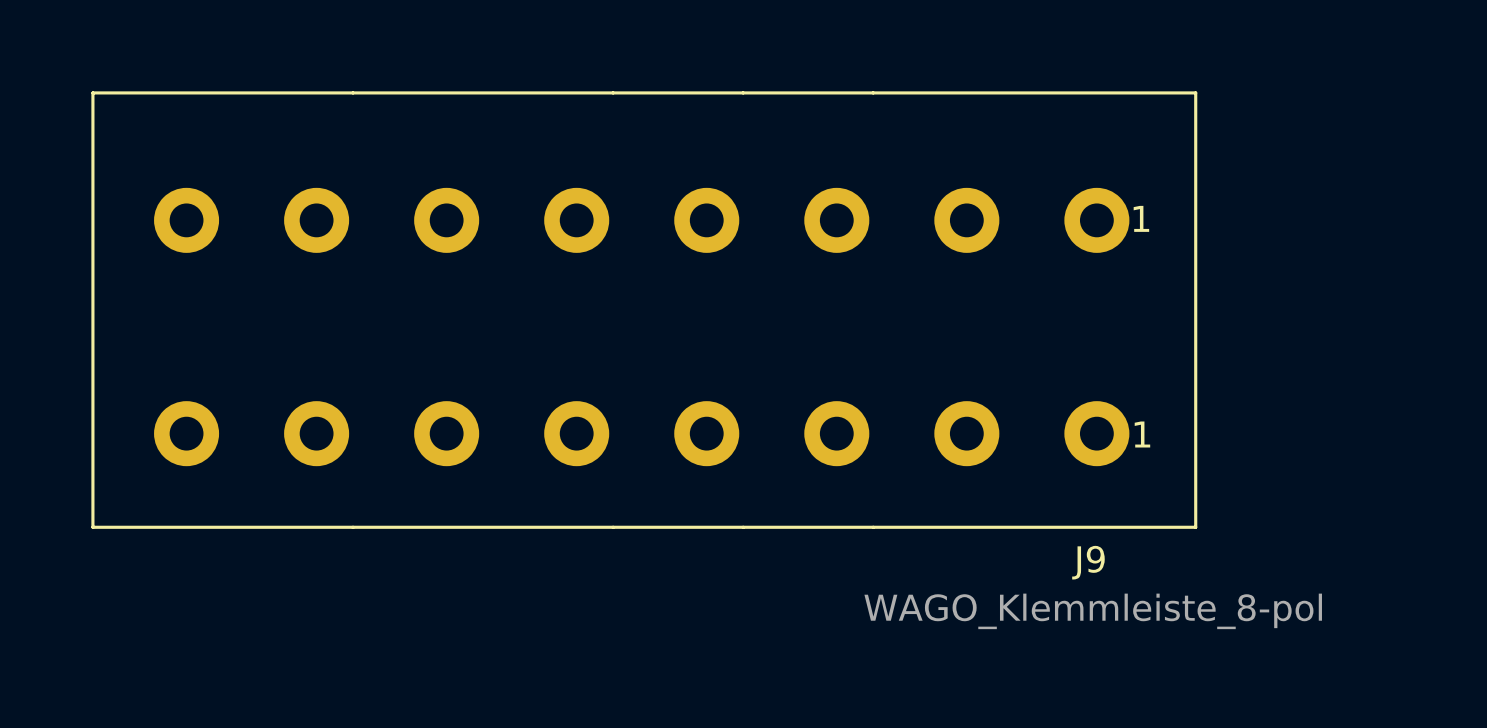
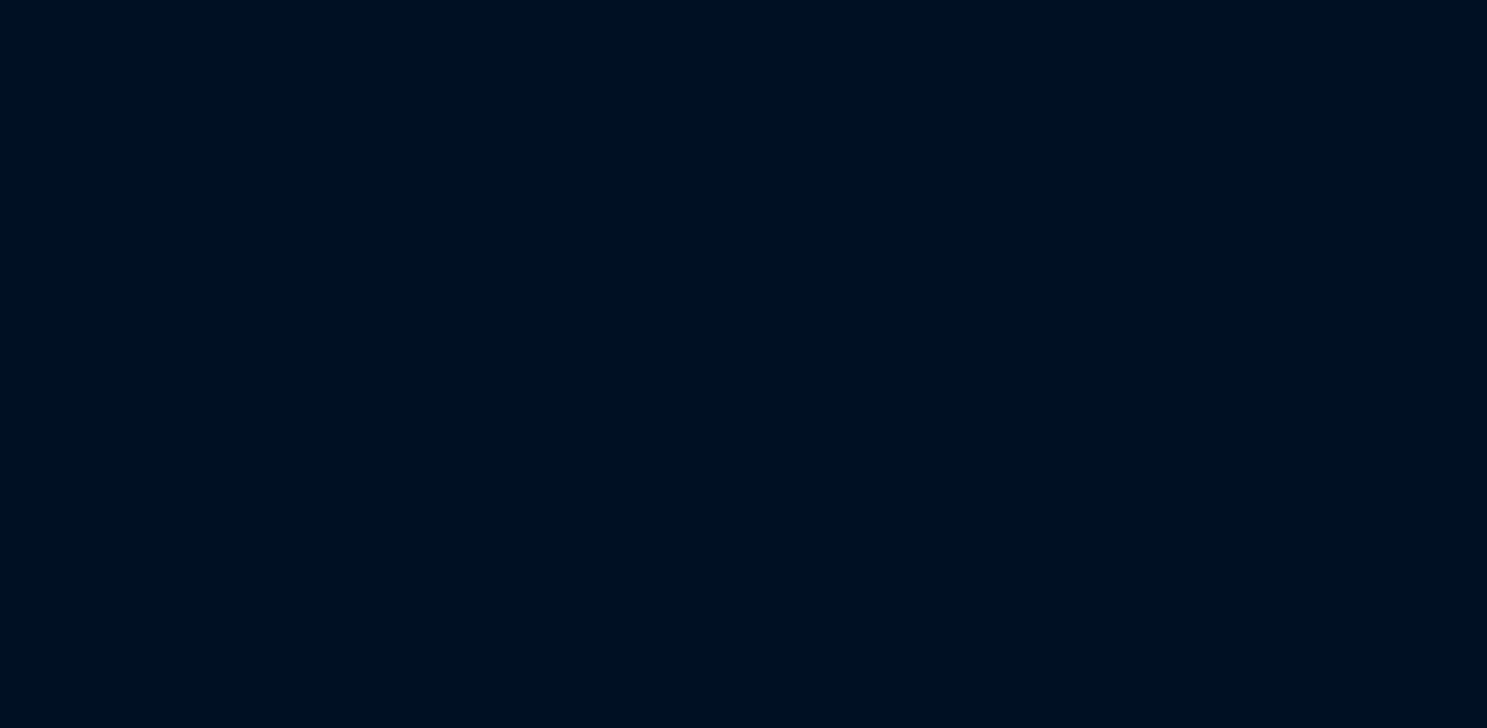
J9: WAGO_Klemmleiste_8-pol (644, 310) -> none

